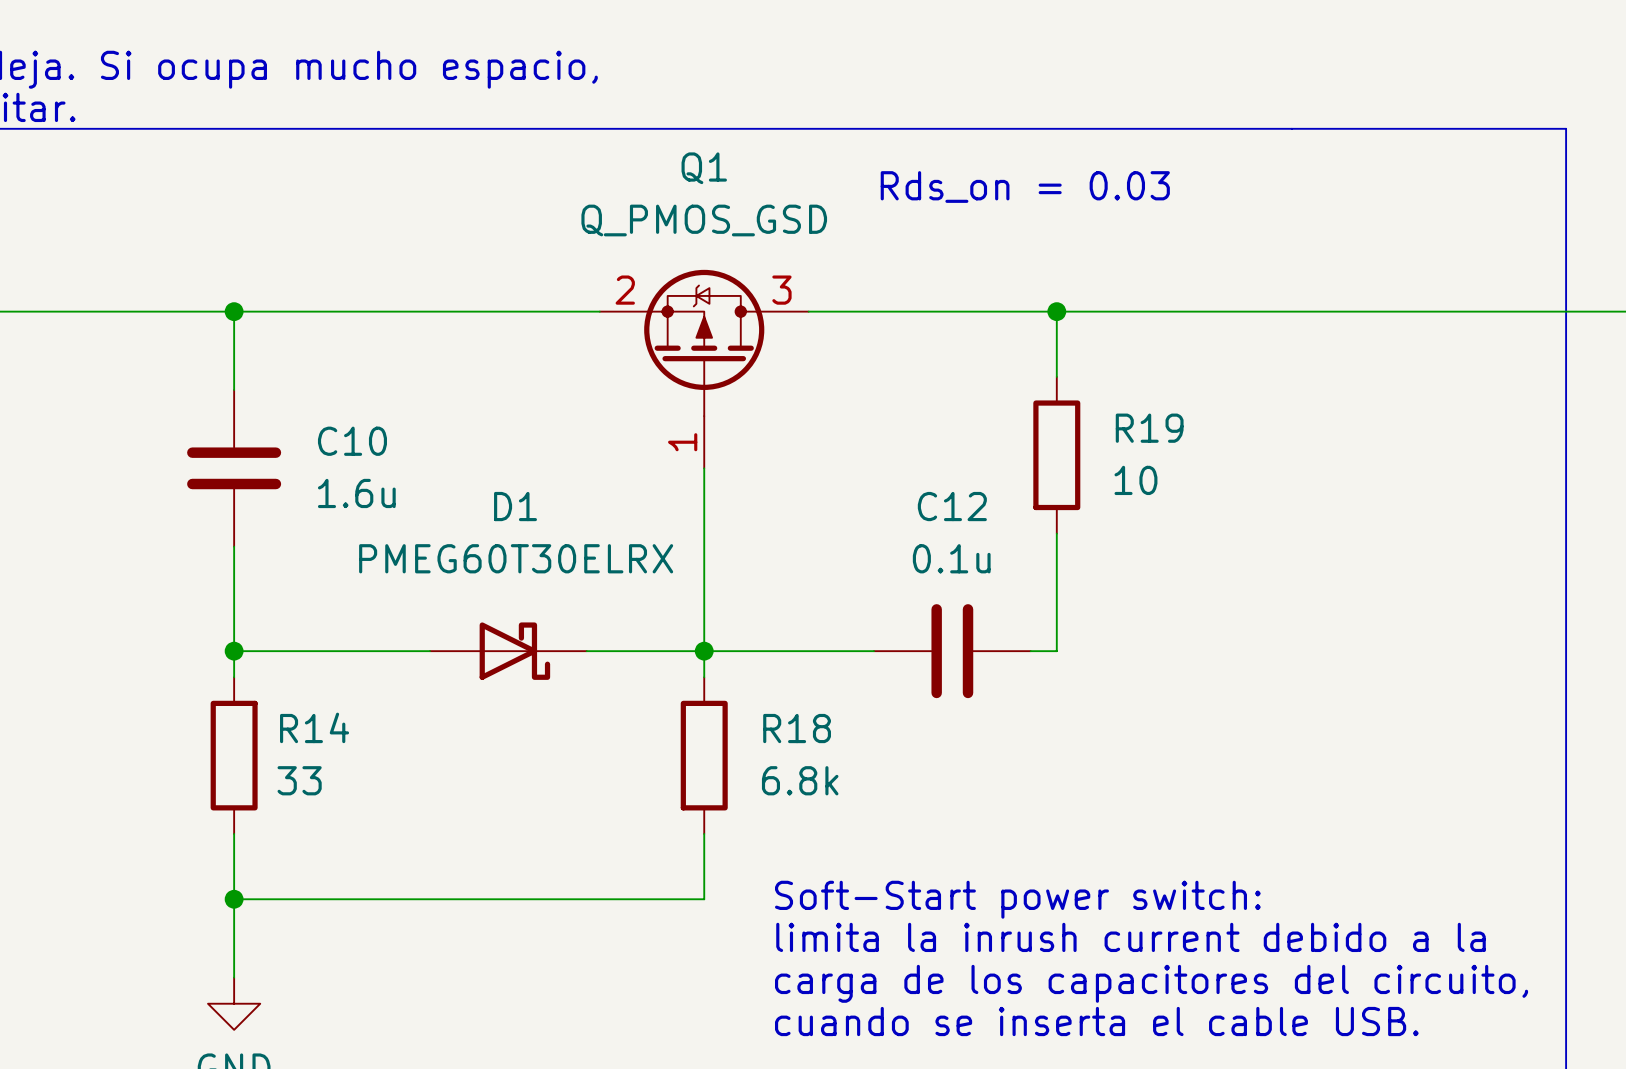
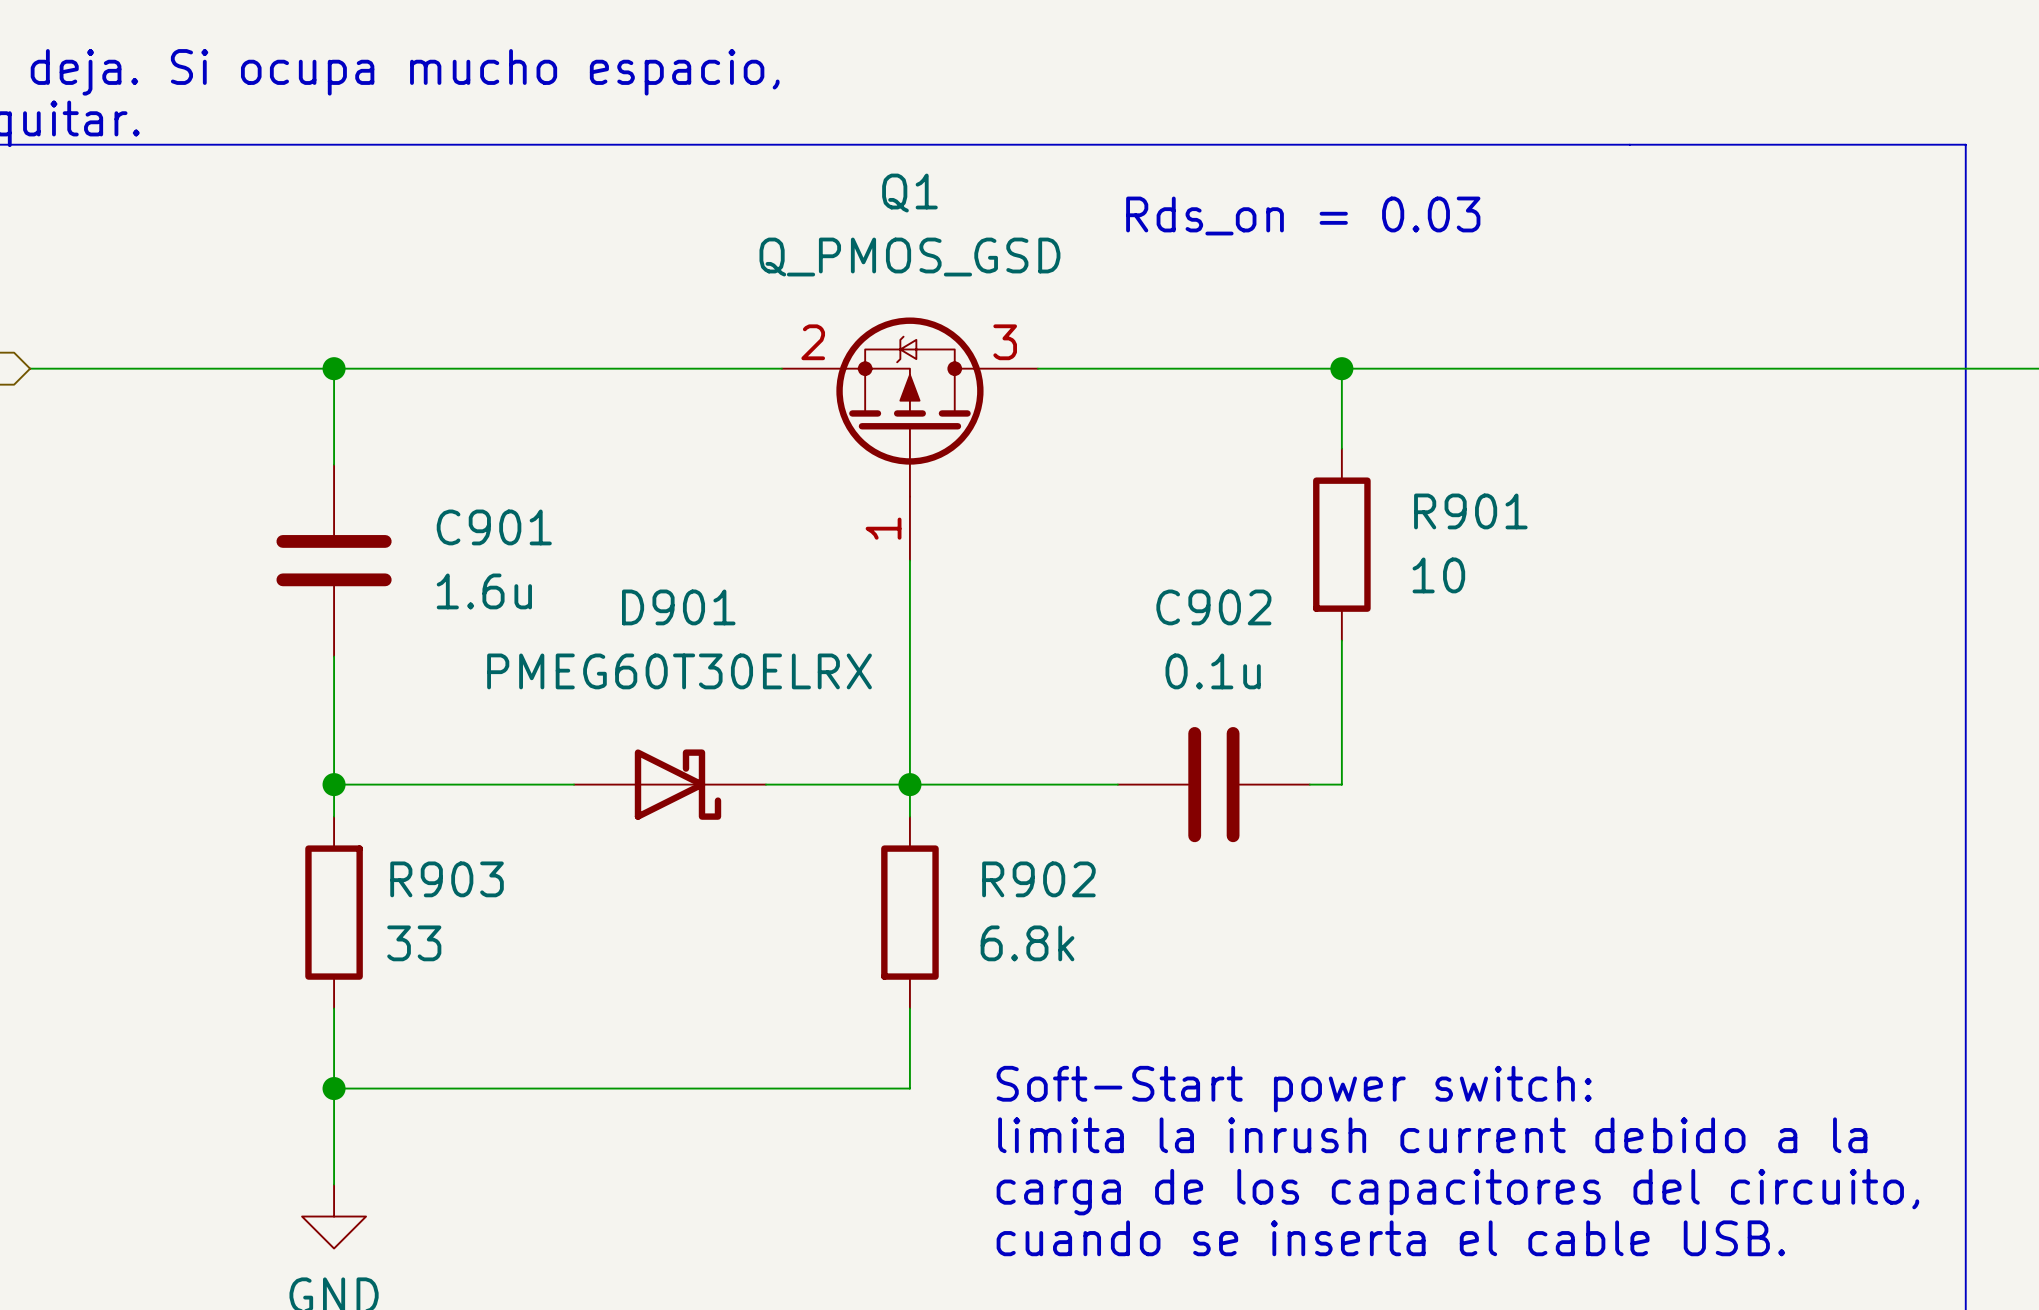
R19 name: R19 (1149, 428) -> R901 (1470, 511)
C10 name: C10 (352, 441) -> C901 (494, 527)
D1 name: D1 (515, 506) -> D901 (678, 607)
C12 name: C12 (952, 506) -> C902 (1213, 607)
R14 name: R14 (314, 727) -> R903 (447, 879)
R18 name: R18 (797, 728) -> R902 (1038, 879)

